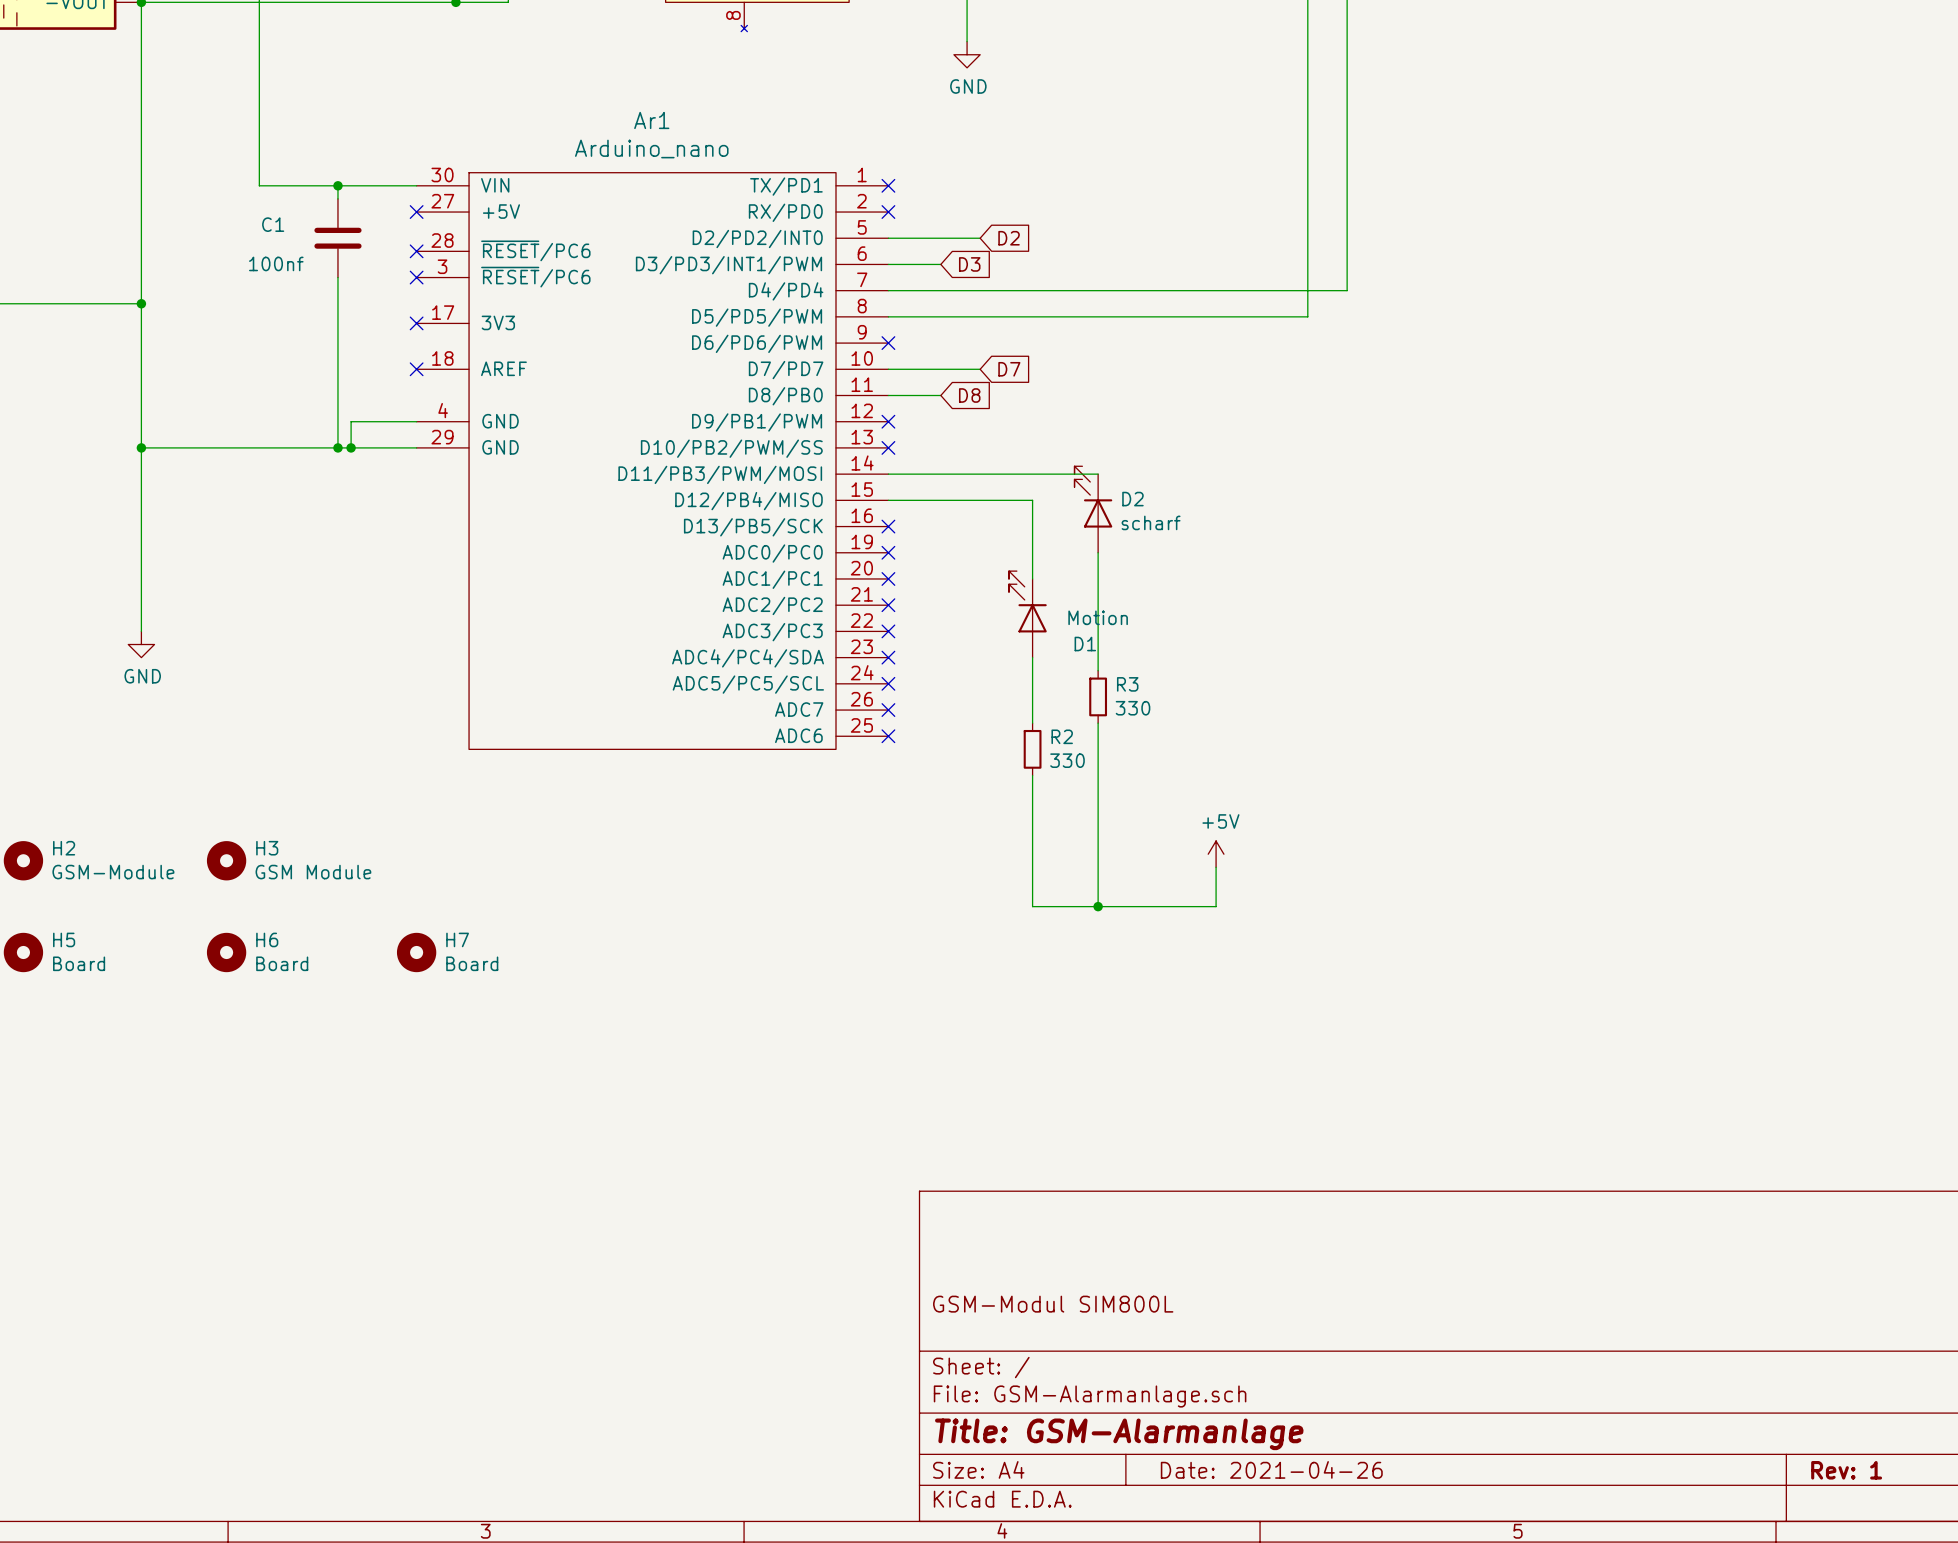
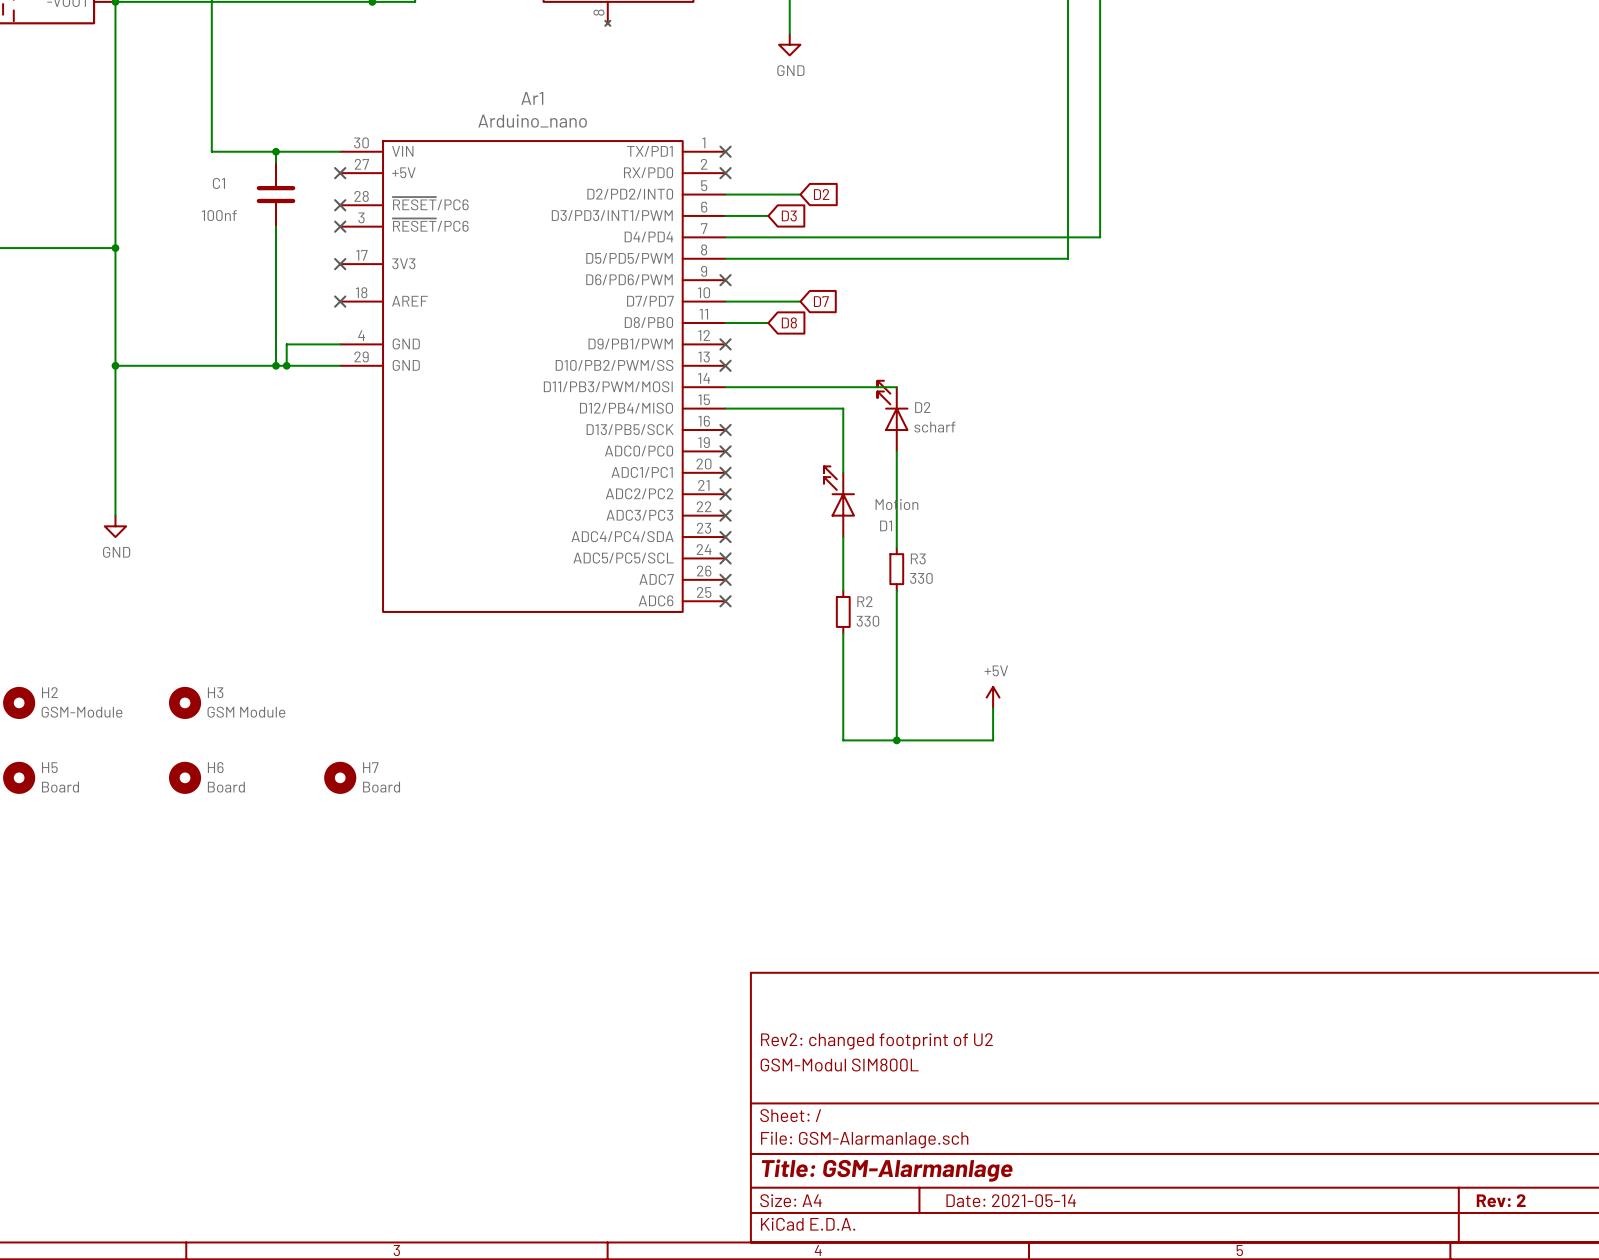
title block: none -> Rev2: changed footprint of U2 (876, 1041)
title block: Date: 2021-04-26 (1271, 1469) -> Date: 2021-05-14 (1011, 1200)
title block: Rev: 1 (1846, 1470) -> Rev: 2 (1501, 1200)

